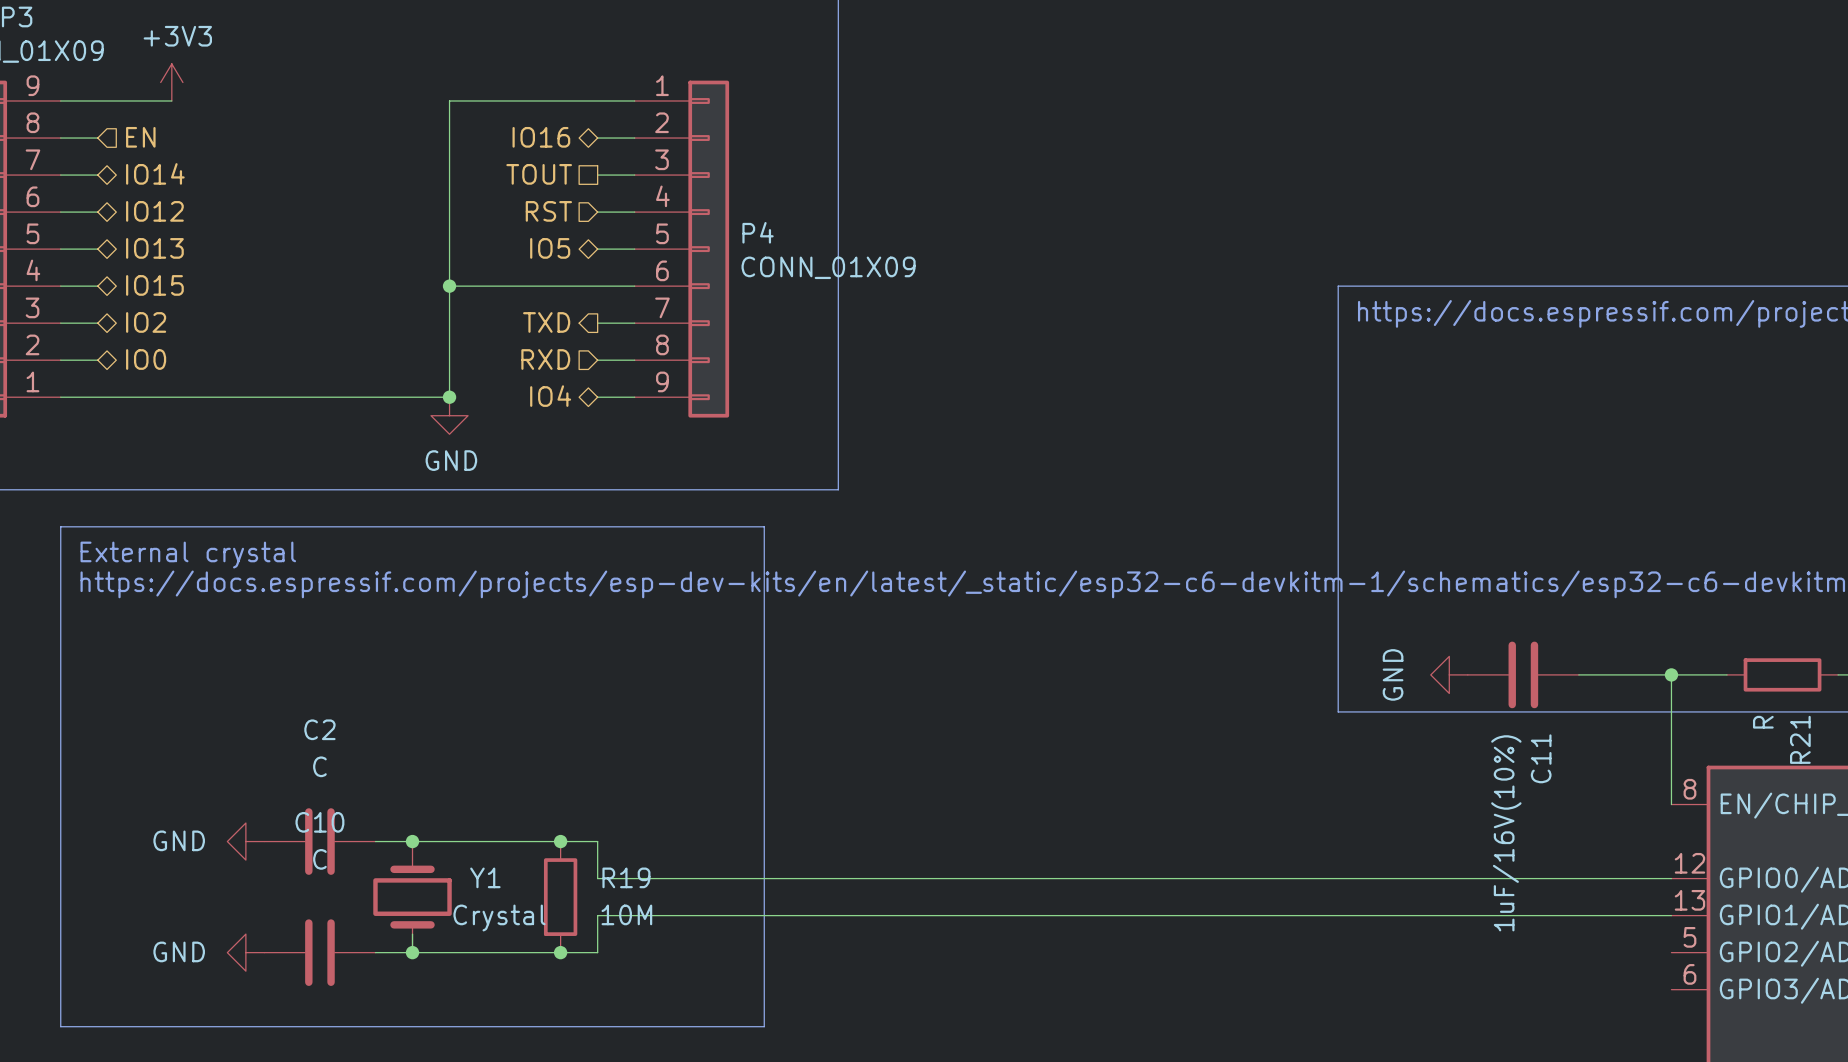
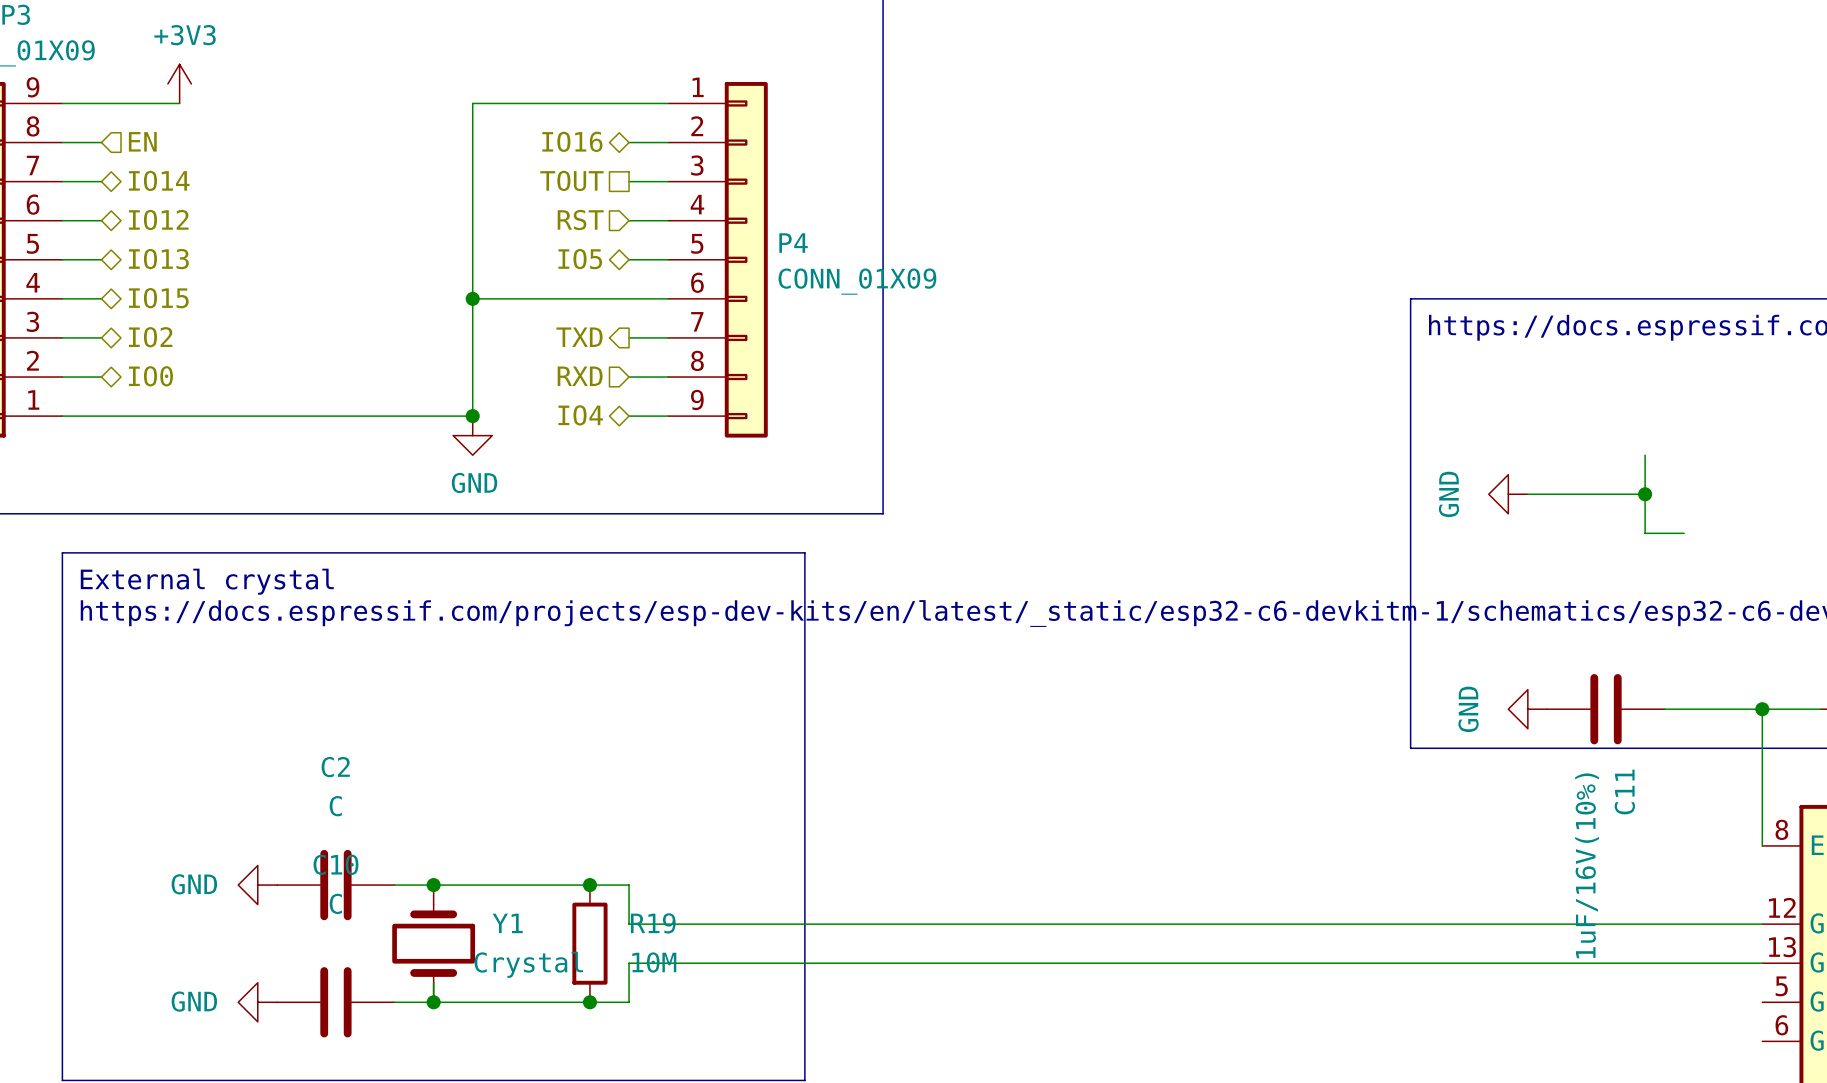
wire: none -> (1645, 455) (1645, 533) (1684, 533)
power symbol: none -> GND (1508, 494)
wire: none -> (1527, 494) (1645, 494)
junction: none -> (1645, 494)

